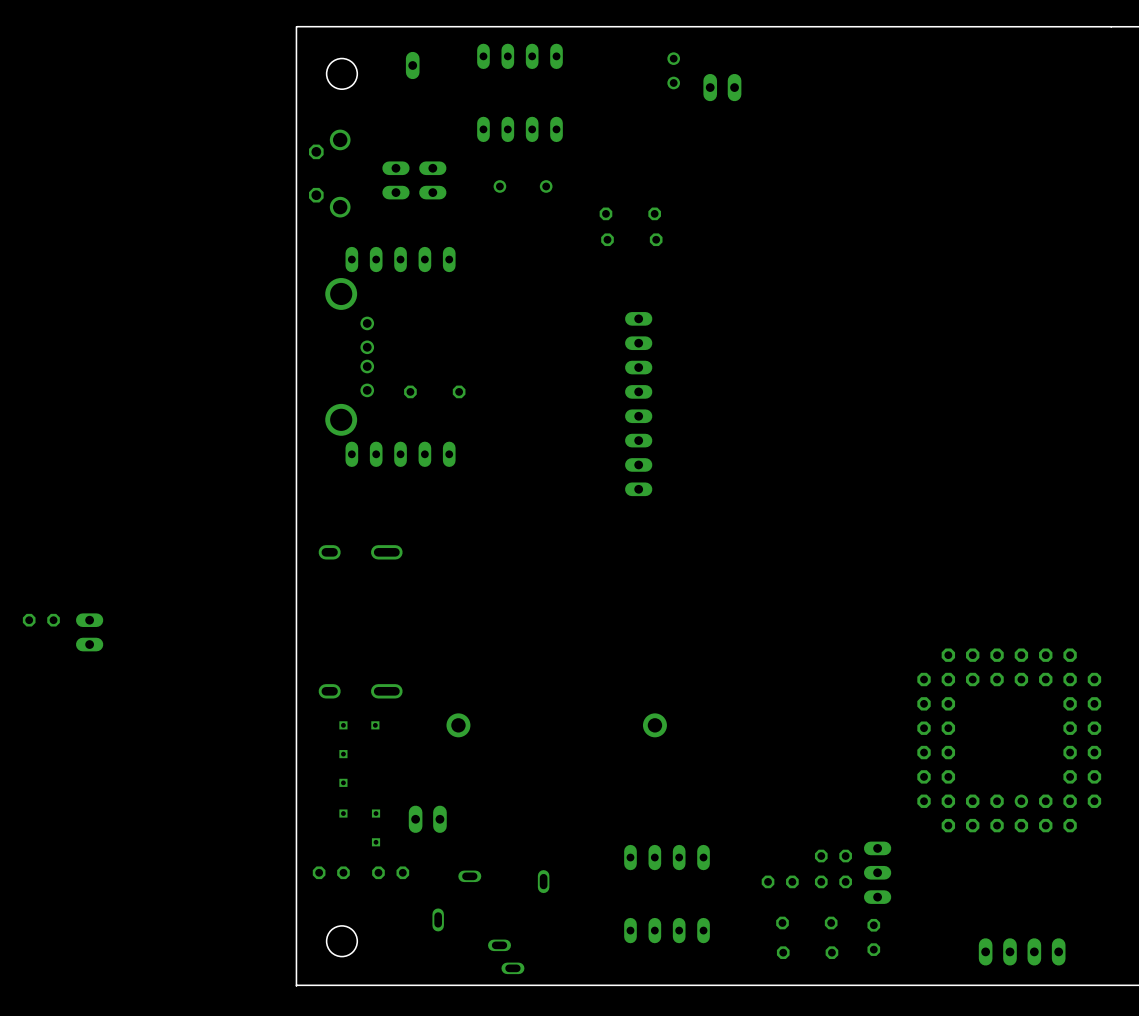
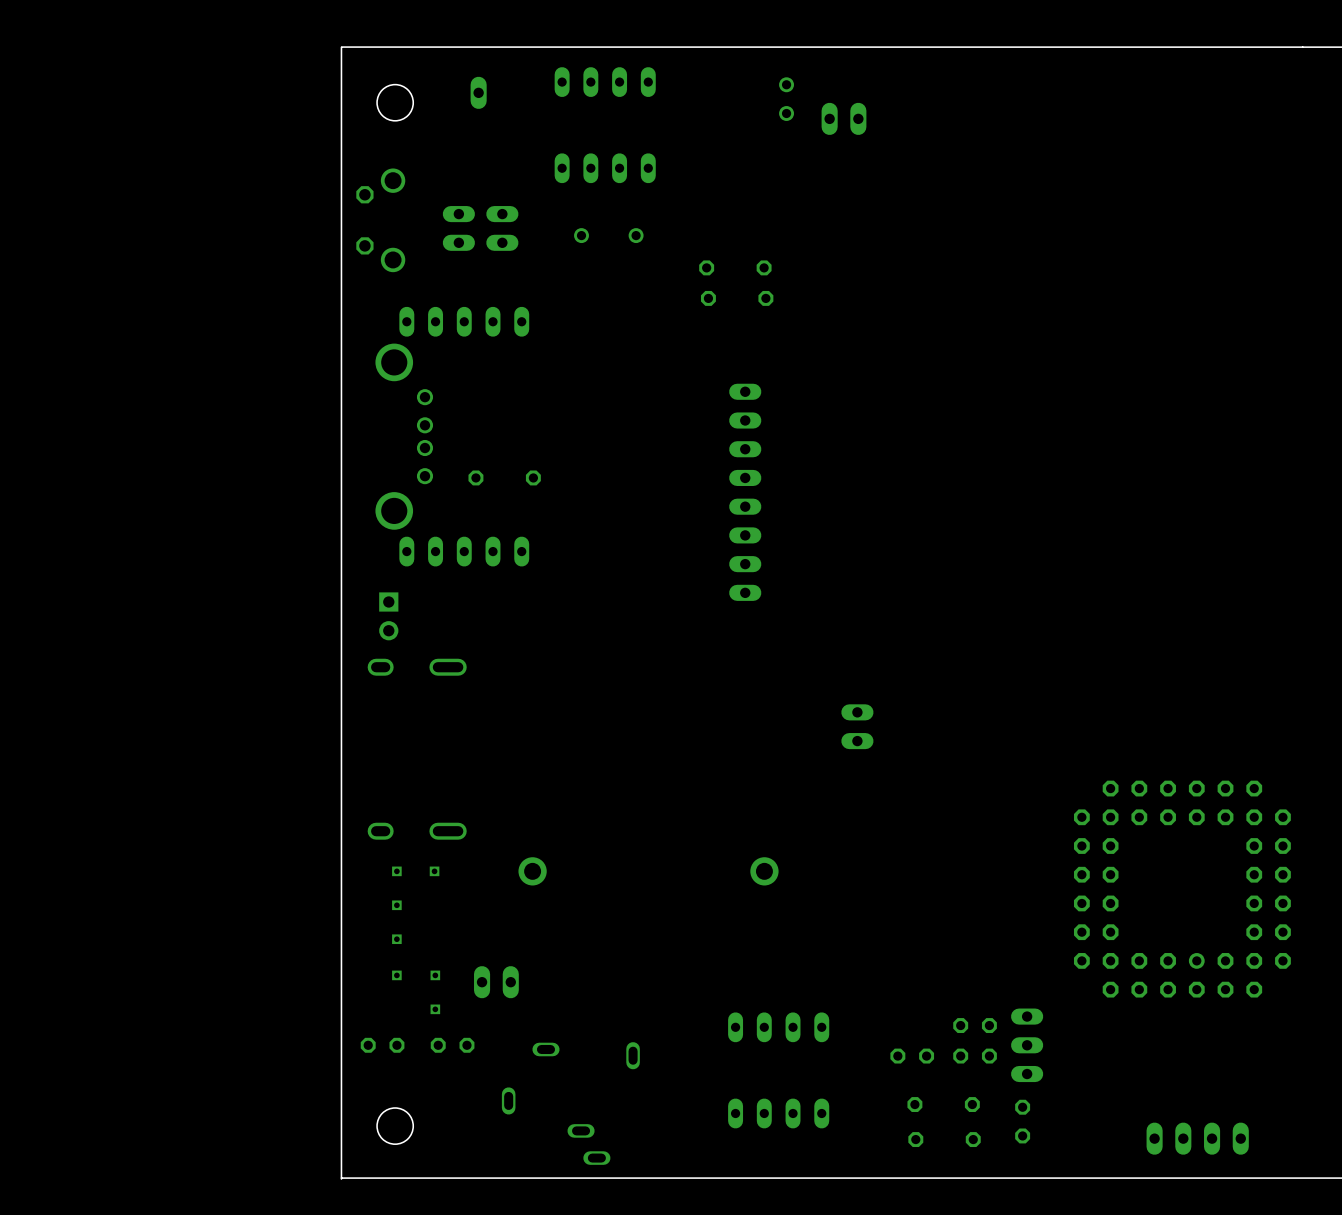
part: none -> (388, 616)
part: none -> (857, 726)
part: (41, 620) -> none
part: (89, 632) -> none

